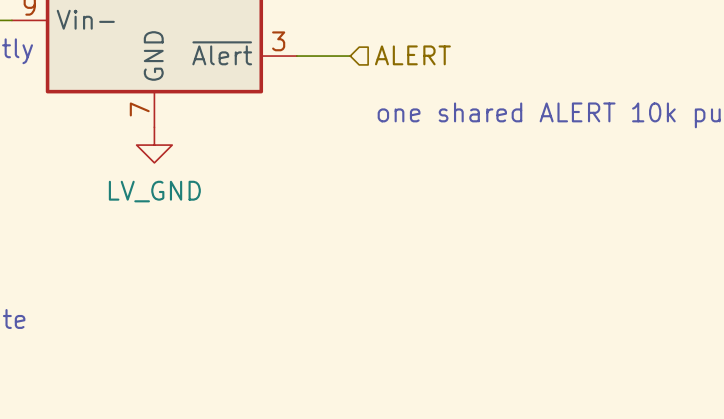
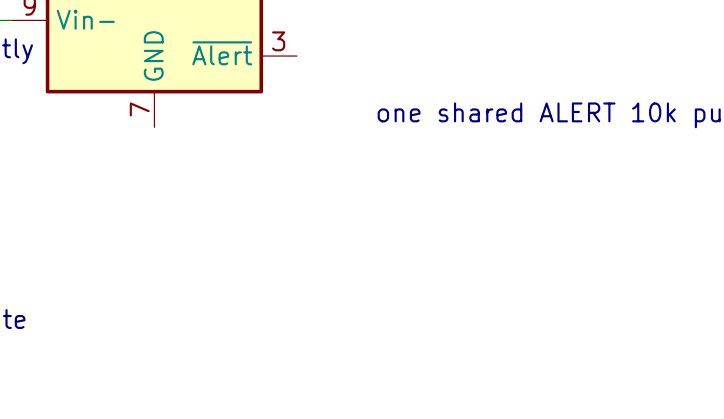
hierarchical label: ALERT (412, 55) -> none
wire: (296, 56) (350, 56) -> none
power symbol: LV_GND (154, 145) -> none

